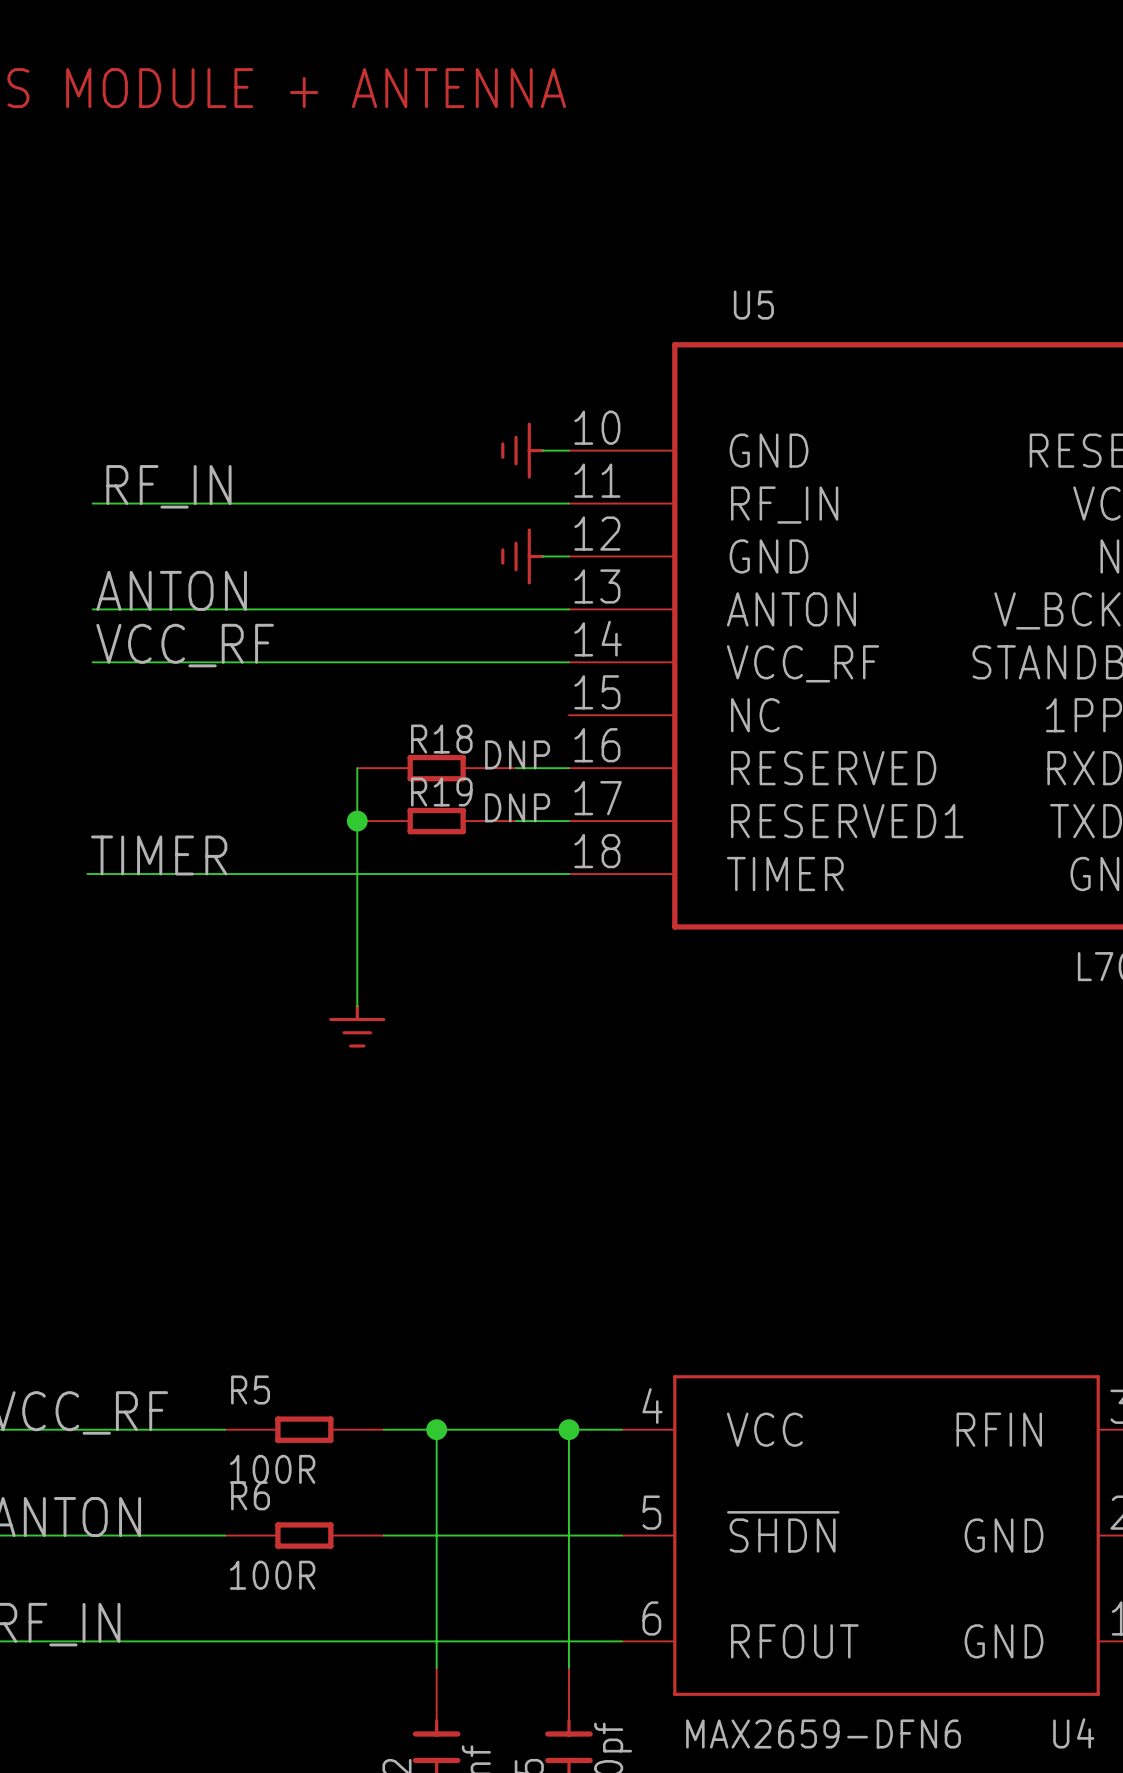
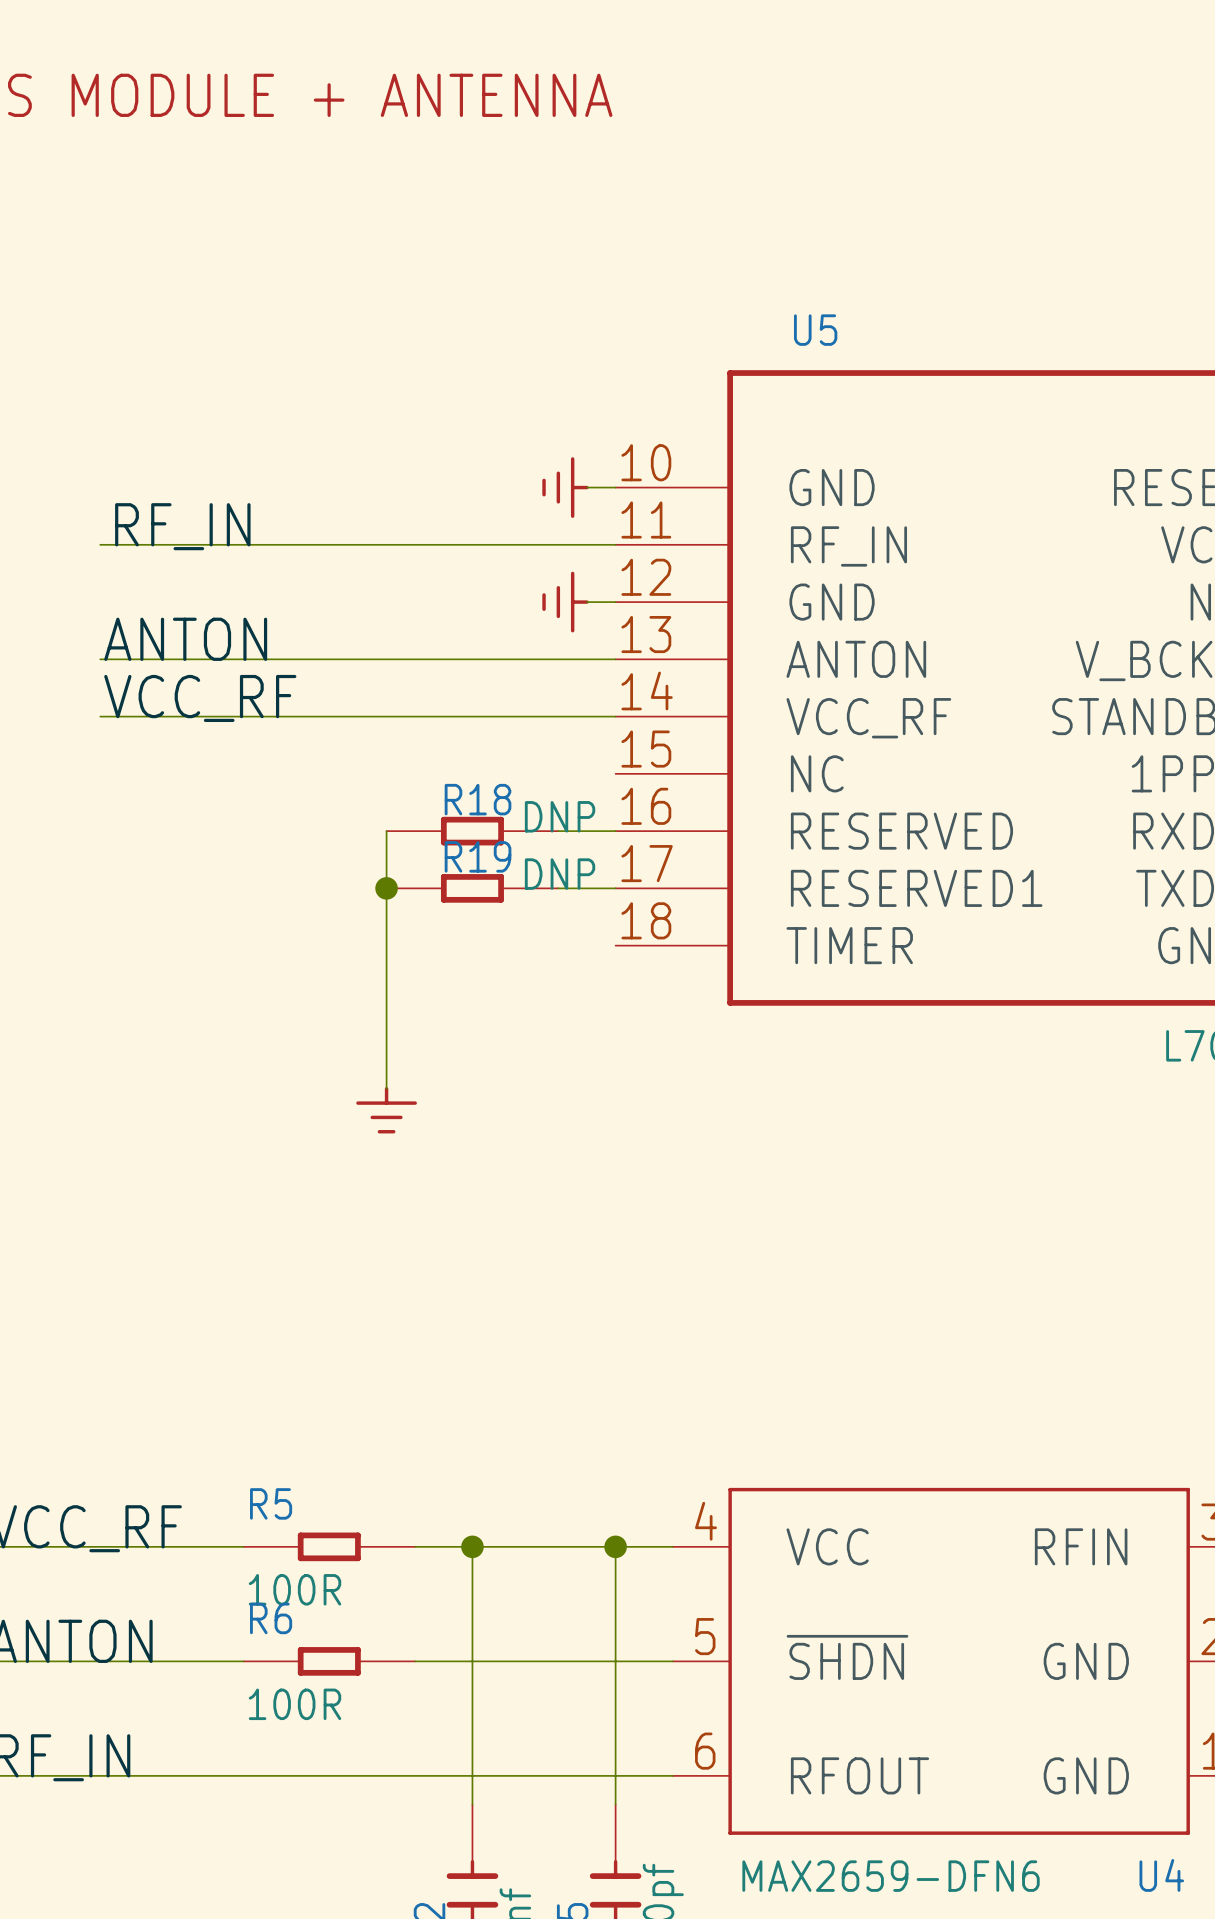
label: TIMER (159, 855) -> none
wire: (87, 874) (568, 874) -> none

